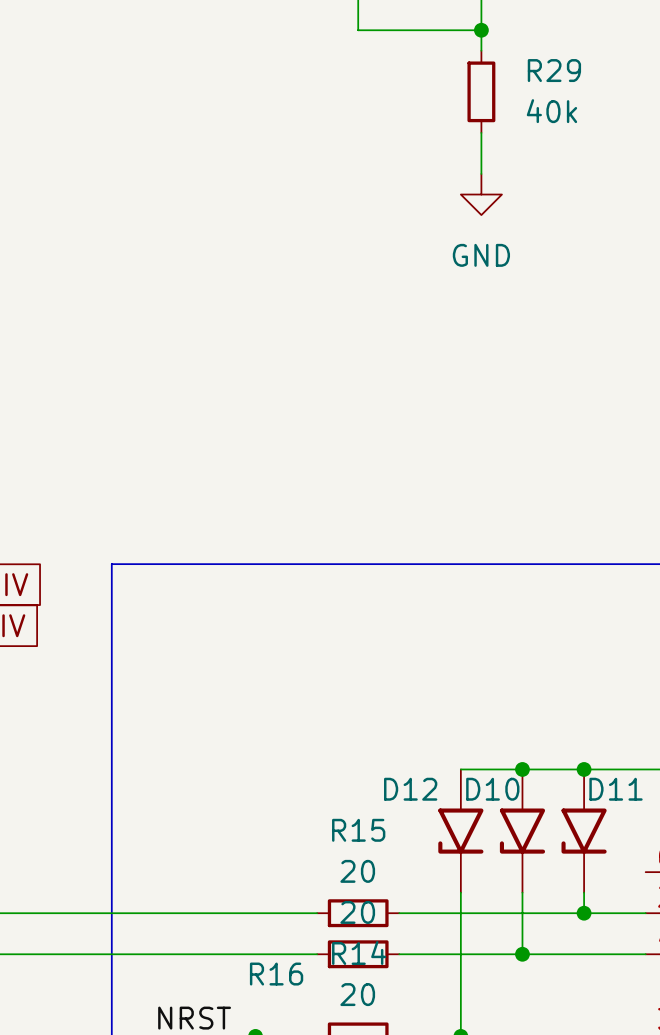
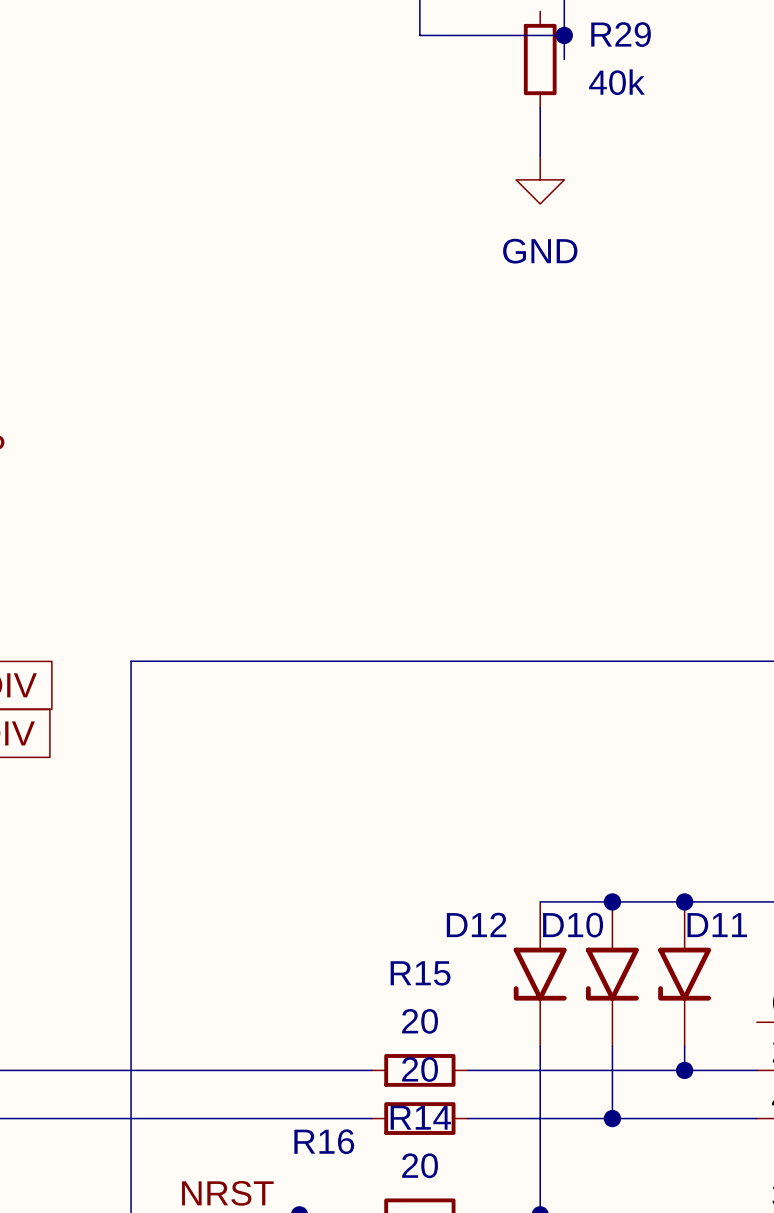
R29 position: (481, 91) -> (540, 59)
wire: (481, 132) (481, 173) -> (540, 107) (540, 155)
power symbol position: GND (481, 194) -> GND (540, 179)

